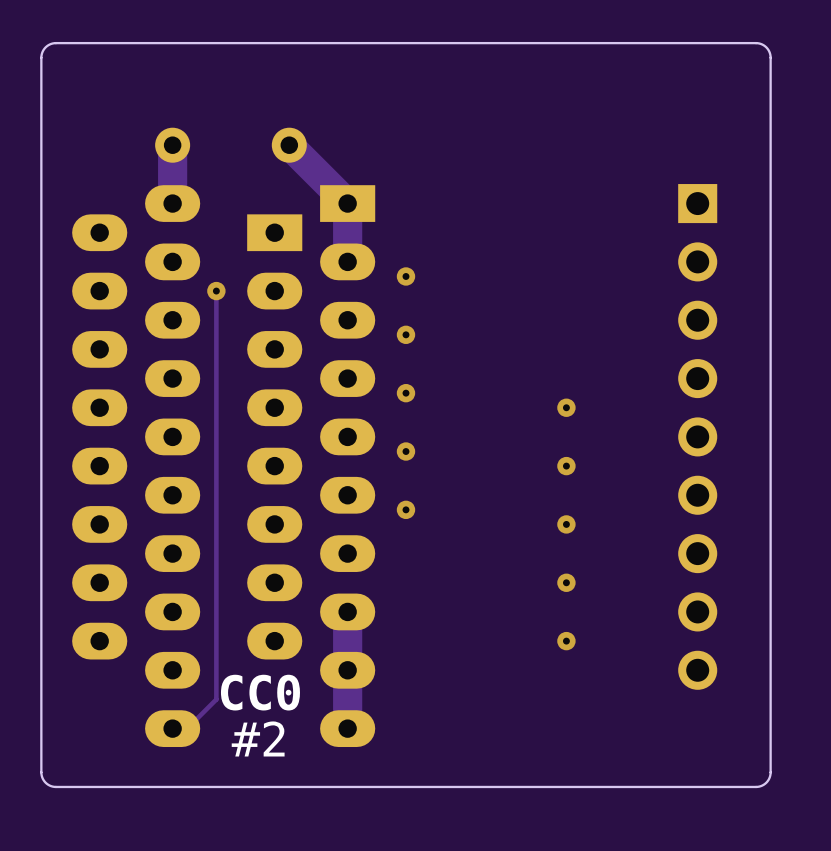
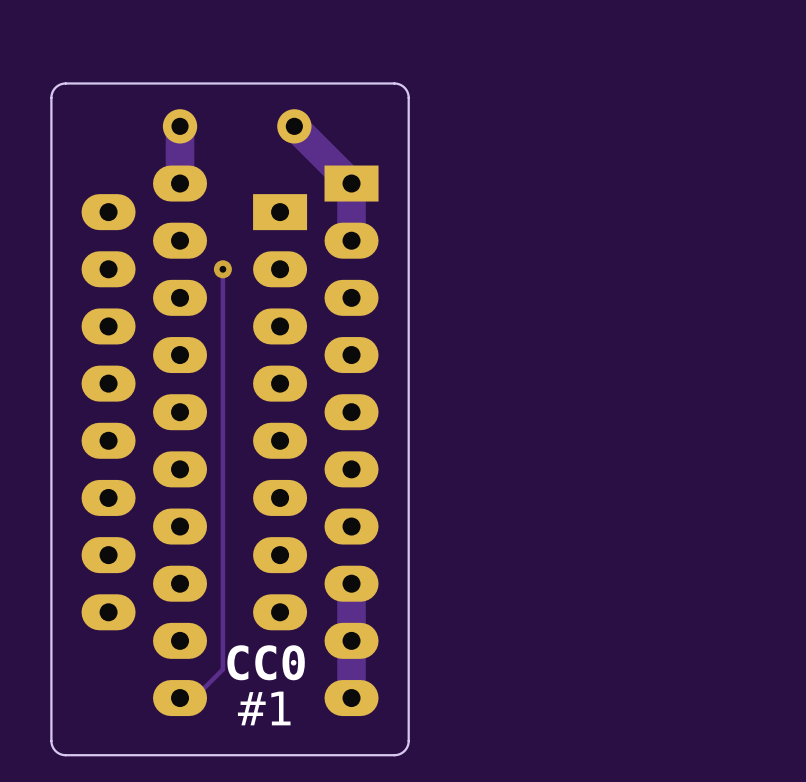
board edge: (41, 116) (41, 54) (46, 46) (54, 43) (756, 43) (763, 45) (769, 51) (769, 778) (763, 784) (756, 786) (391, 786) -> (51, 97) (55, 87) (65, 83) (394, 83) (402, 85) (407, 91) (408, 740) (404, 751) (394, 755)
via: (405, 276) -> none
via: (405, 334) -> none
via: (405, 393) -> none
via: (566, 407) -> none
part: (697, 436) -> none
via: (405, 451) -> none
via: (566, 466) -> none
via: (405, 509) -> none
via: (566, 524) -> none
via: (566, 582) -> none
via: (566, 641) -> none
text: #2 (258, 738) -> #1 (264, 708)

